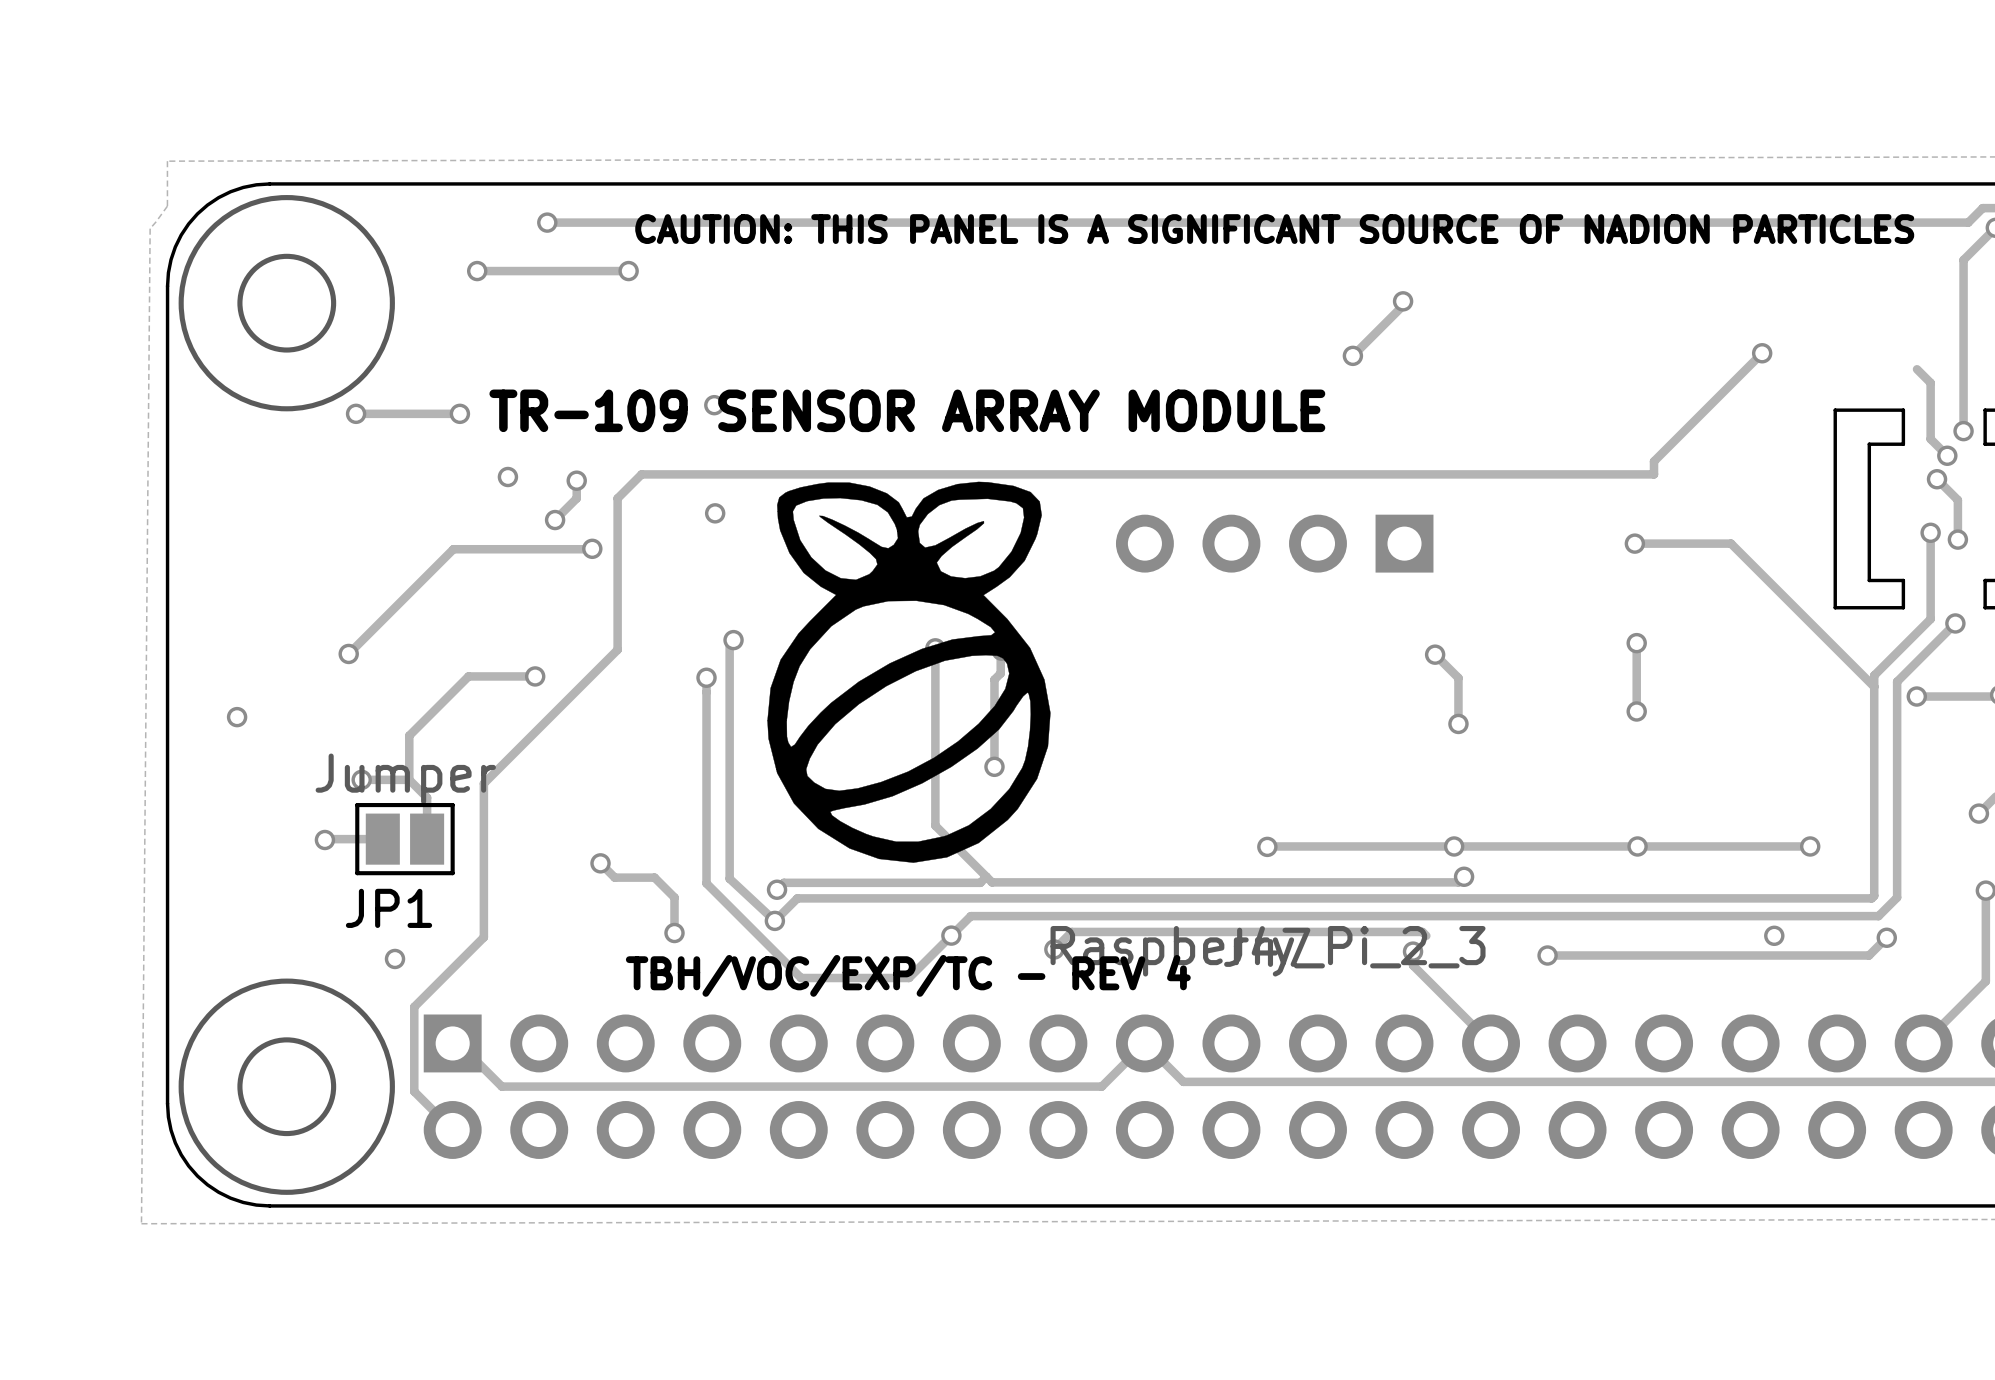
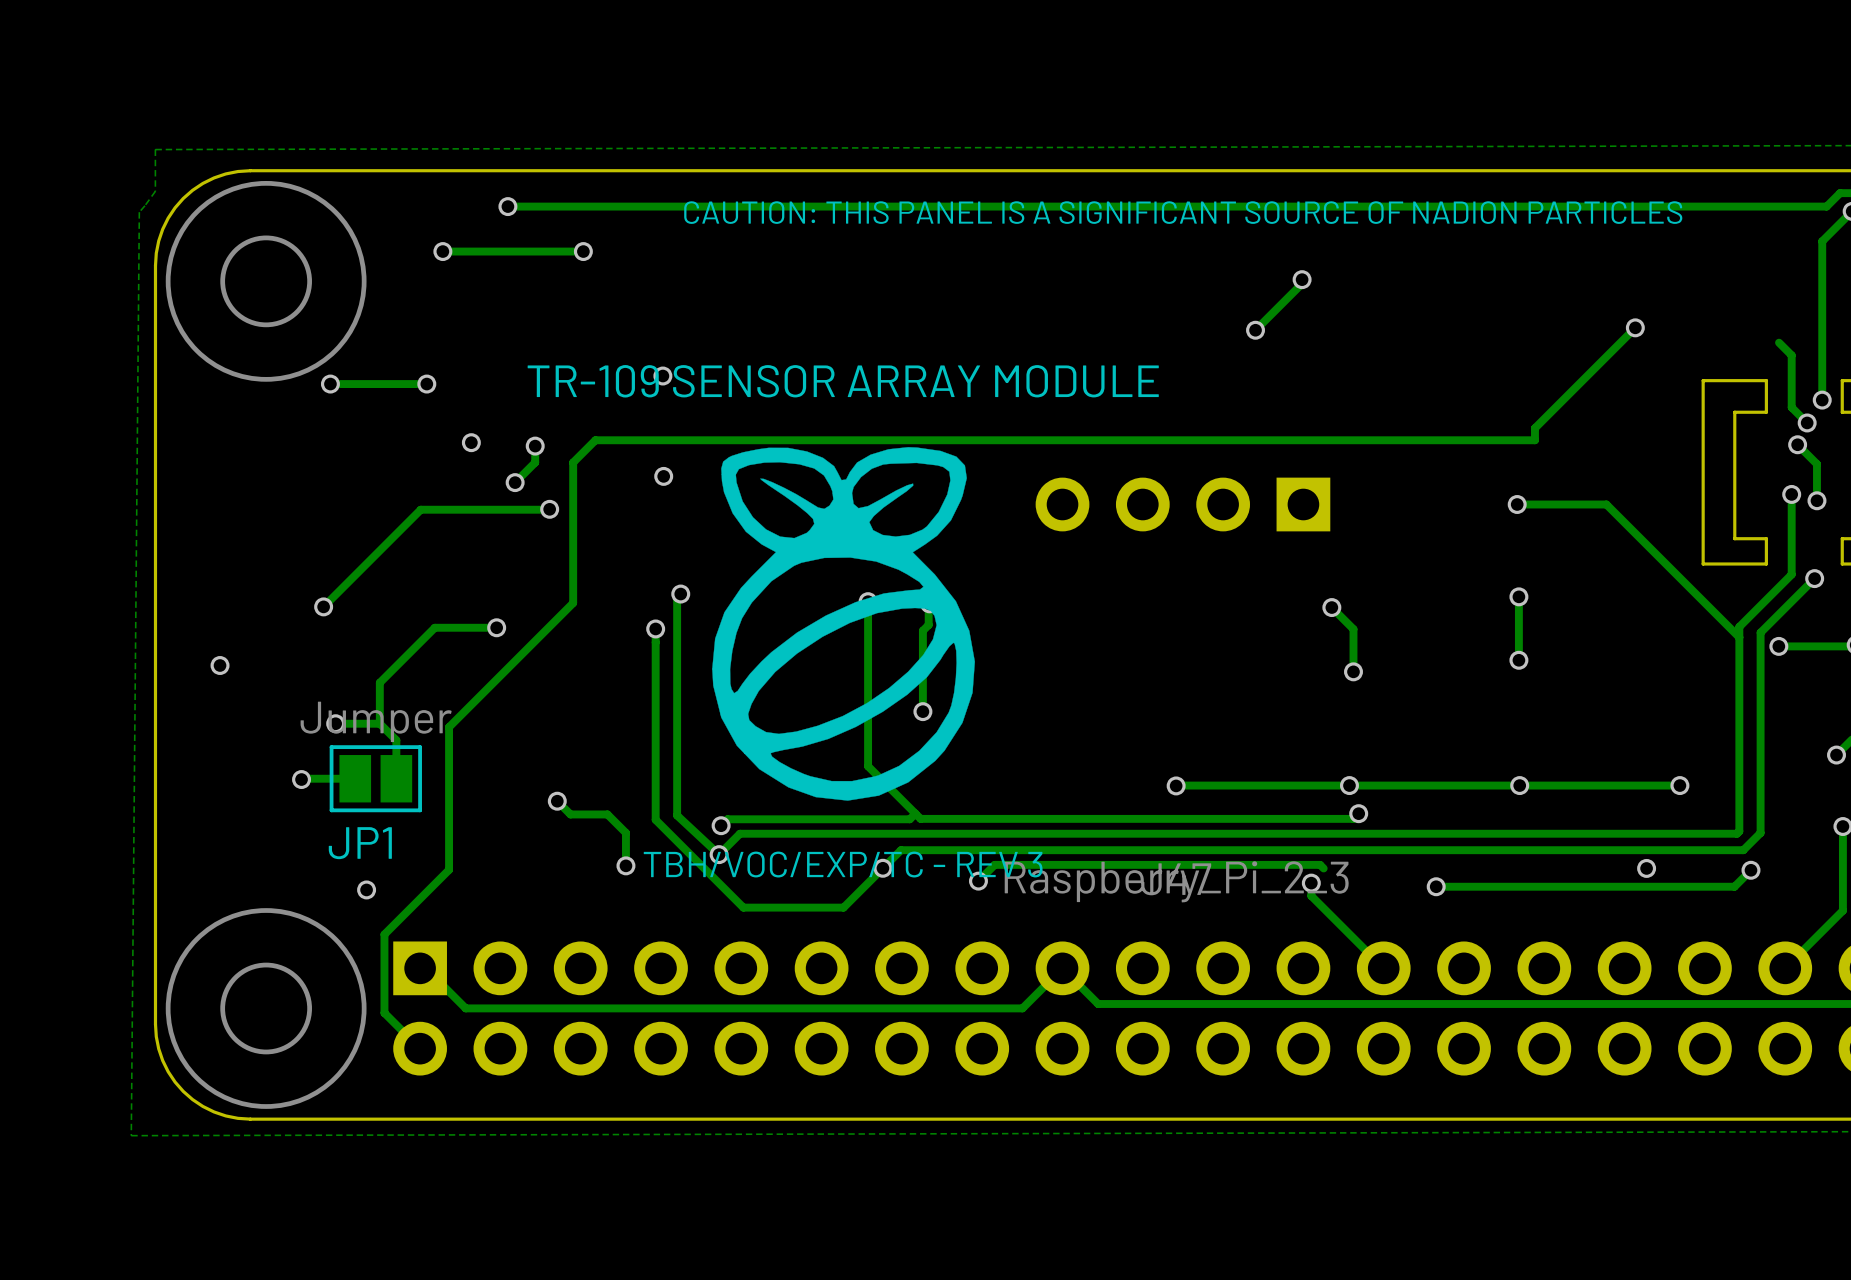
text: TBH/VOC/EXP/TC - REV 4 (908, 975) -> TBH/VOC/EXP/TC - REV 3 (843, 864)

